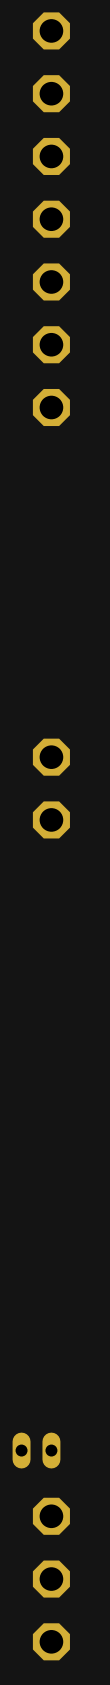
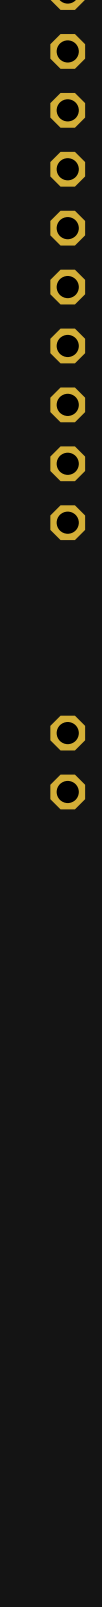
part: none -> (67, 463)
part: none -> (67, 522)
part: (36, 1450) -> none
part: (51, 1516) -> none
part: (51, 1579) -> none
part: (51, 1641) -> none

